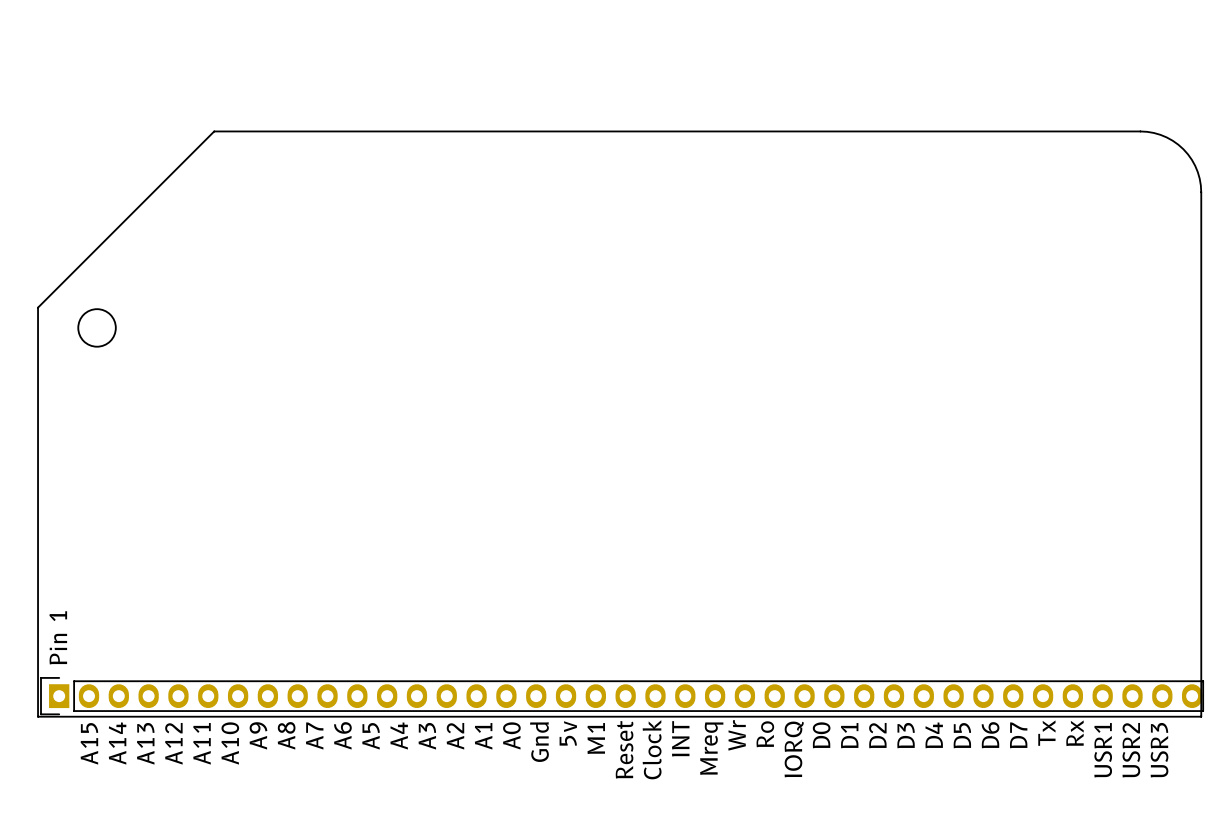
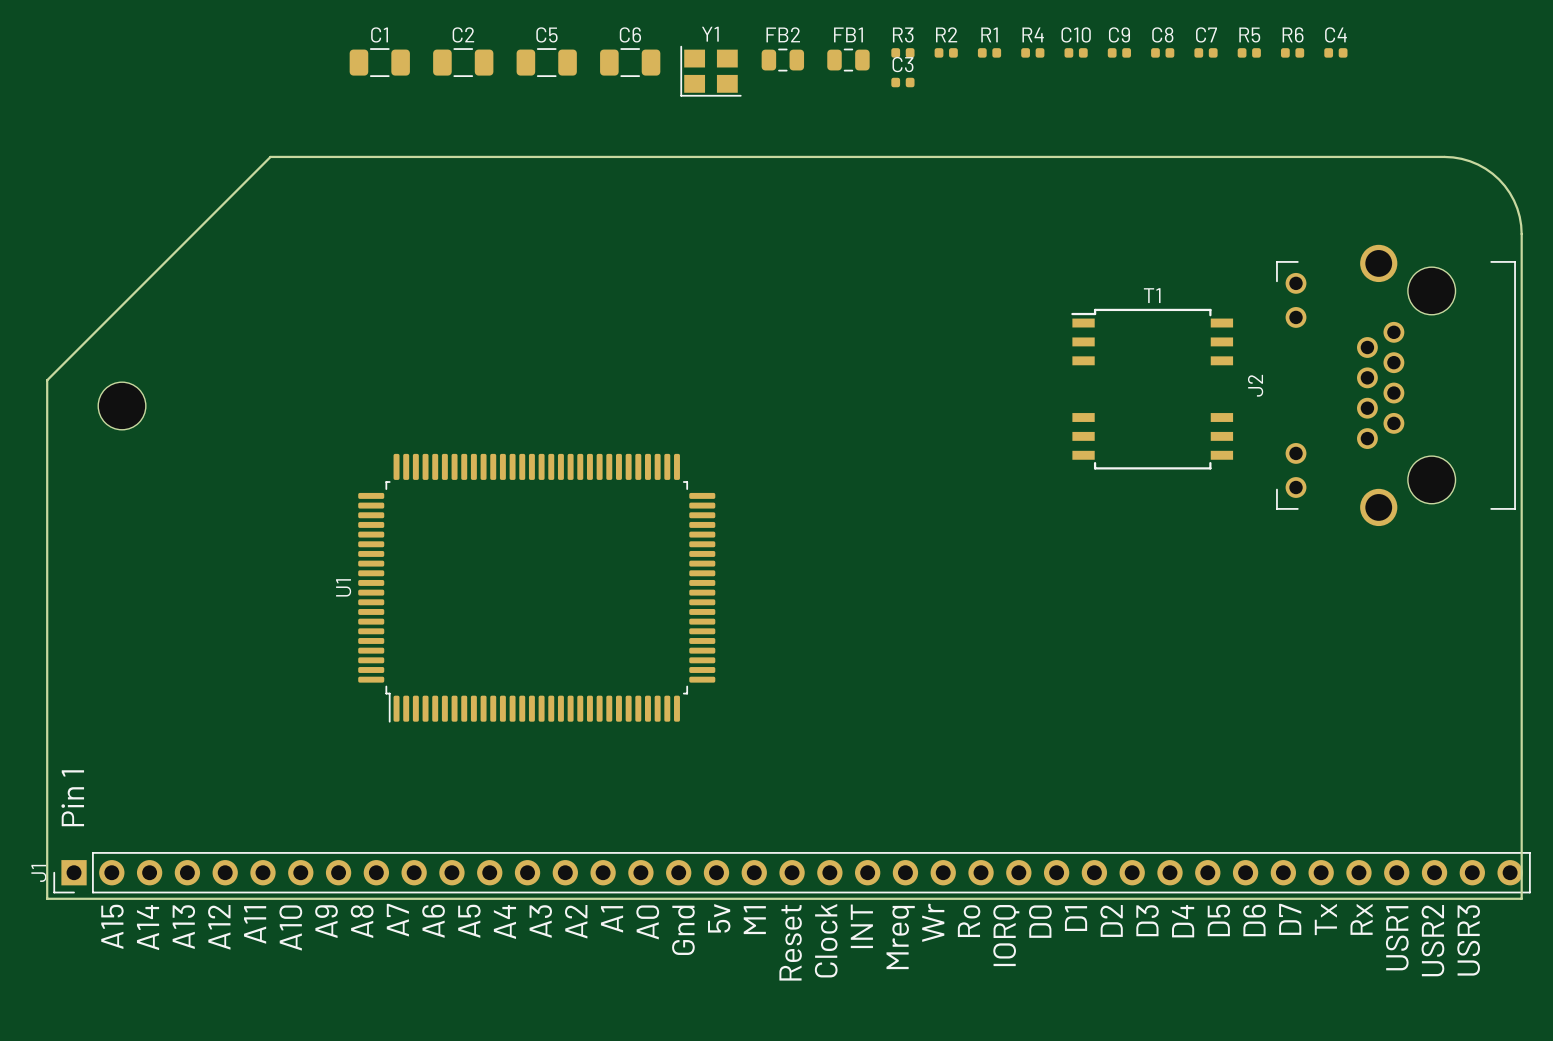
R3: none -> (902, 52)
R2: none -> (946, 52)
R1: none -> (989, 52)
R4: none -> (1032, 52)
C10: none -> (1076, 52)
C9: none -> (1119, 52)
C8: none -> (1162, 52)
C7: none -> (1205, 52)
R5: none -> (1249, 52)
R6: none -> (1292, 52)
C4: none -> (1335, 52)
FB2: none -> (782, 60)
FB1: none -> (848, 60)
C1: none -> (379, 62)
C2: none -> (463, 62)
C5: none -> (546, 62)
C6: none -> (630, 62)
Y1: none -> (710, 71)
C3: none -> (902, 82)
J2: none -> (1395, 385)
T1: none -> (1152, 389)
U1: none -> (536, 588)
part: (622, 696) -> none
J1: none -> (792, 872)

